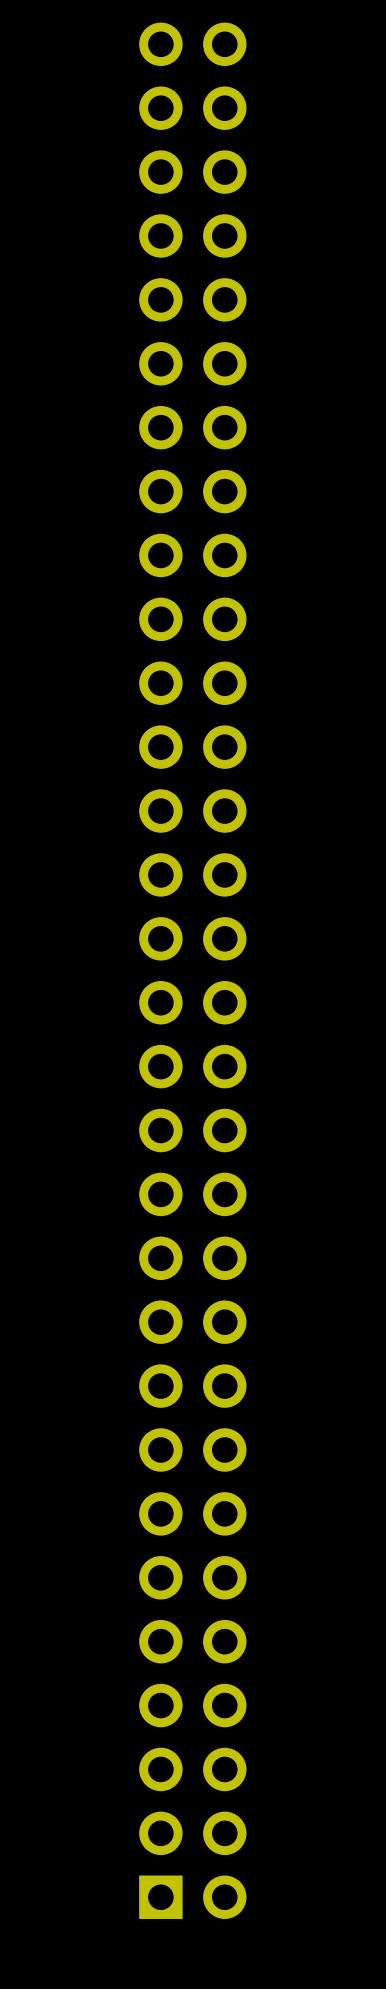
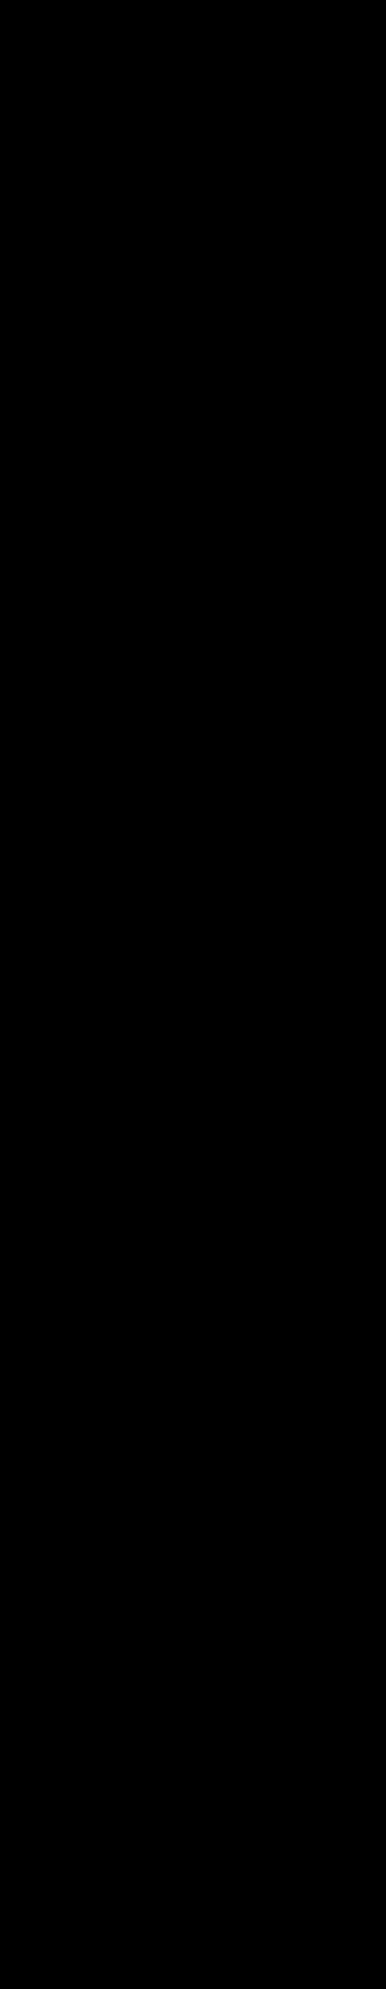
part: (192, 970) -> none

